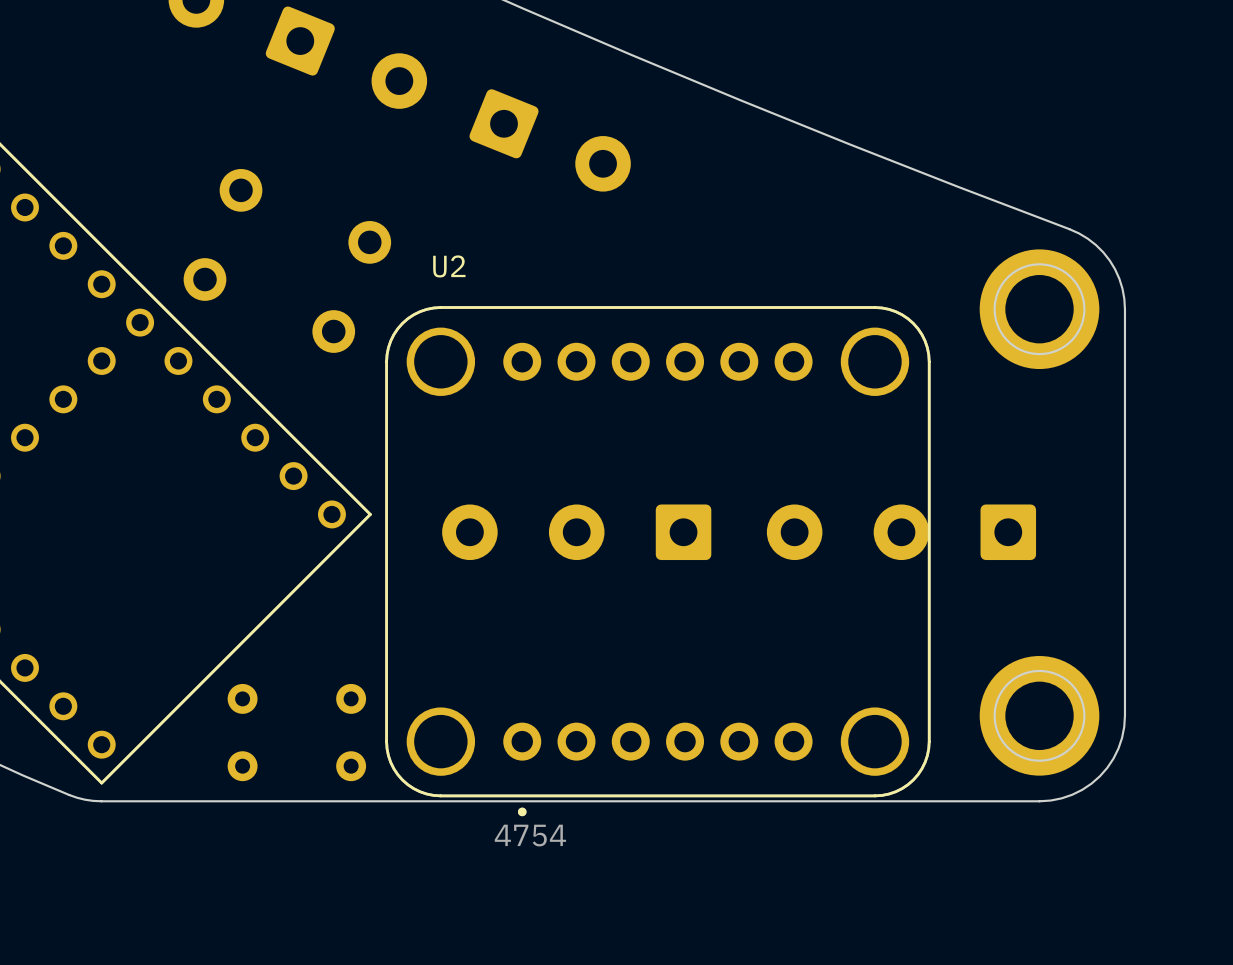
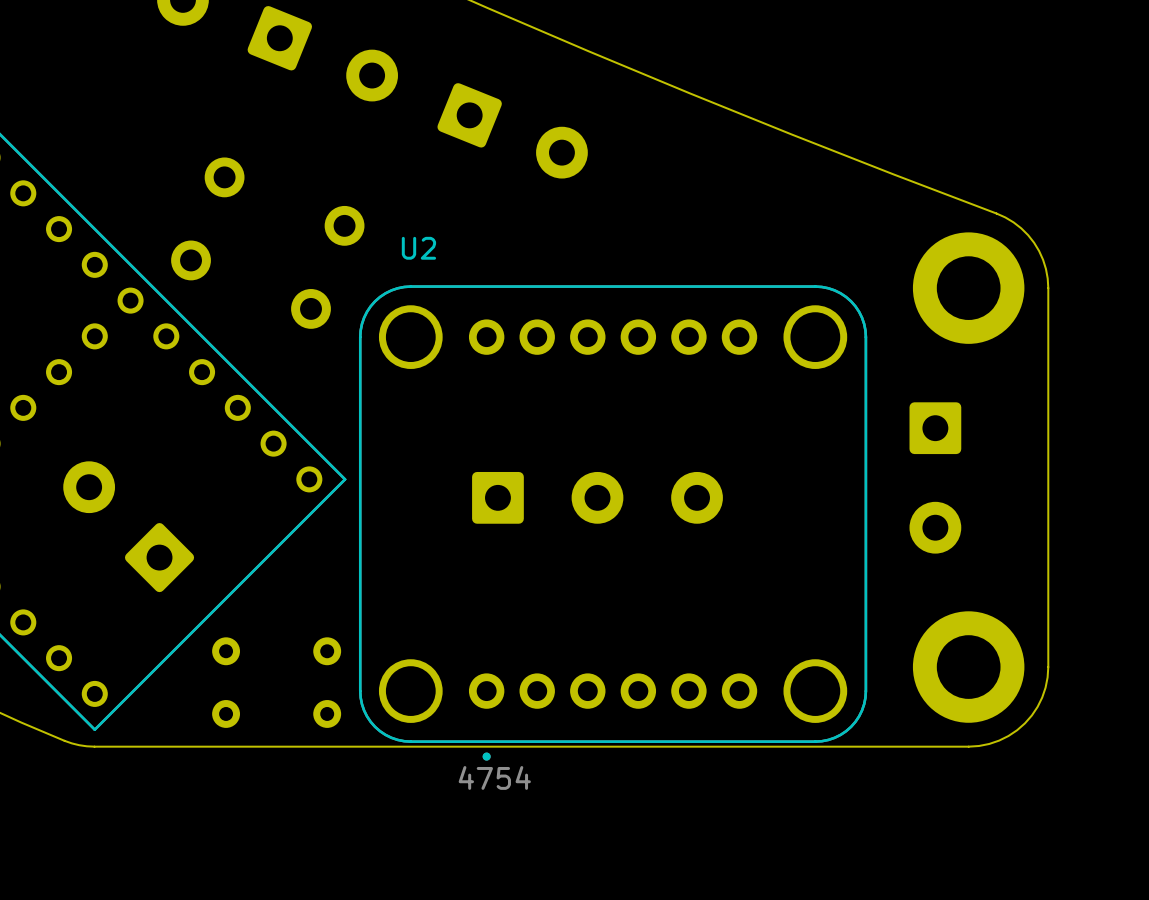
part: none -> (935, 477)
part rotation: 0° (576, 532) -> 180° (597, 497)
part: (901, 532) -> none
part: none -> (128, 526)

